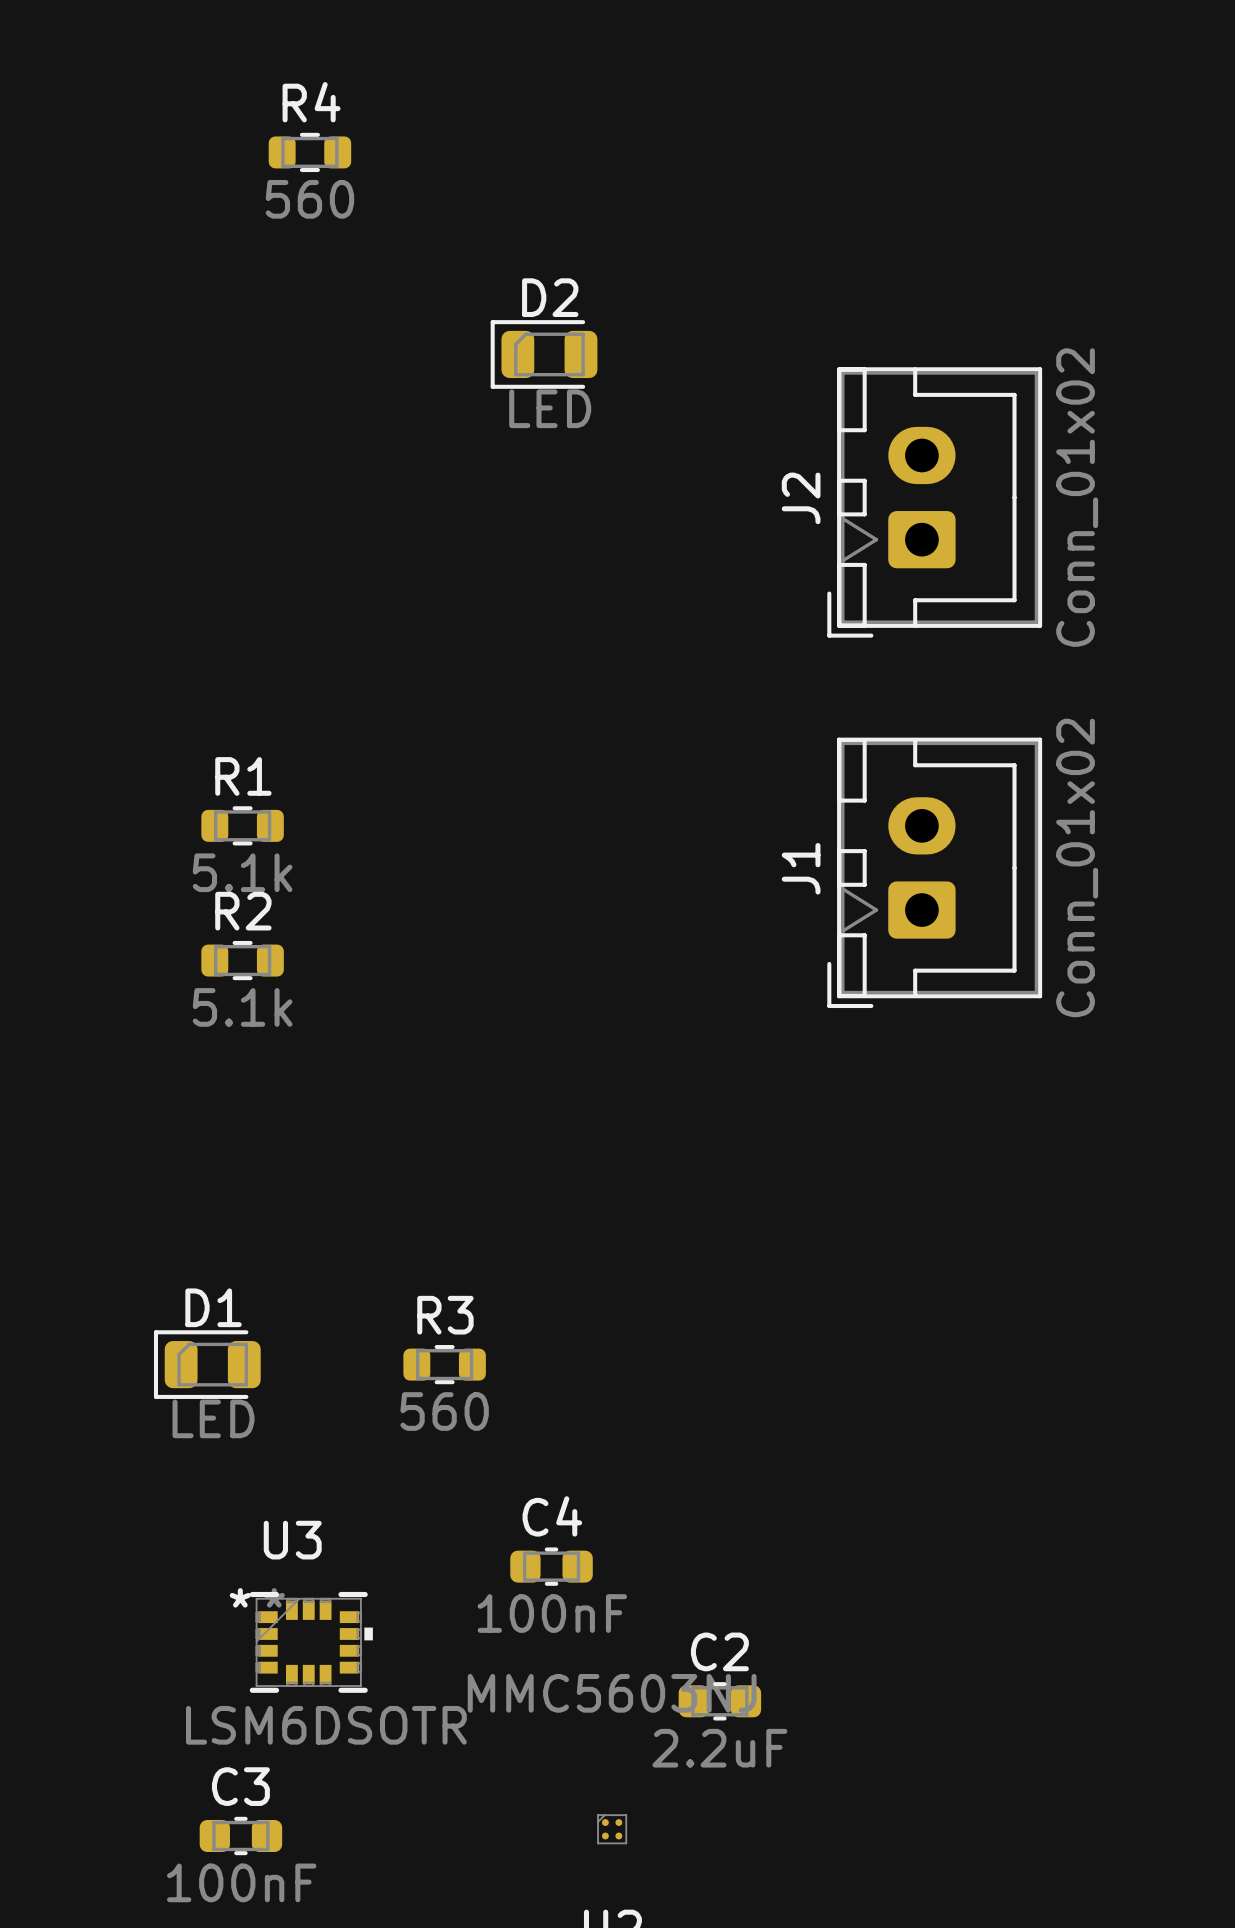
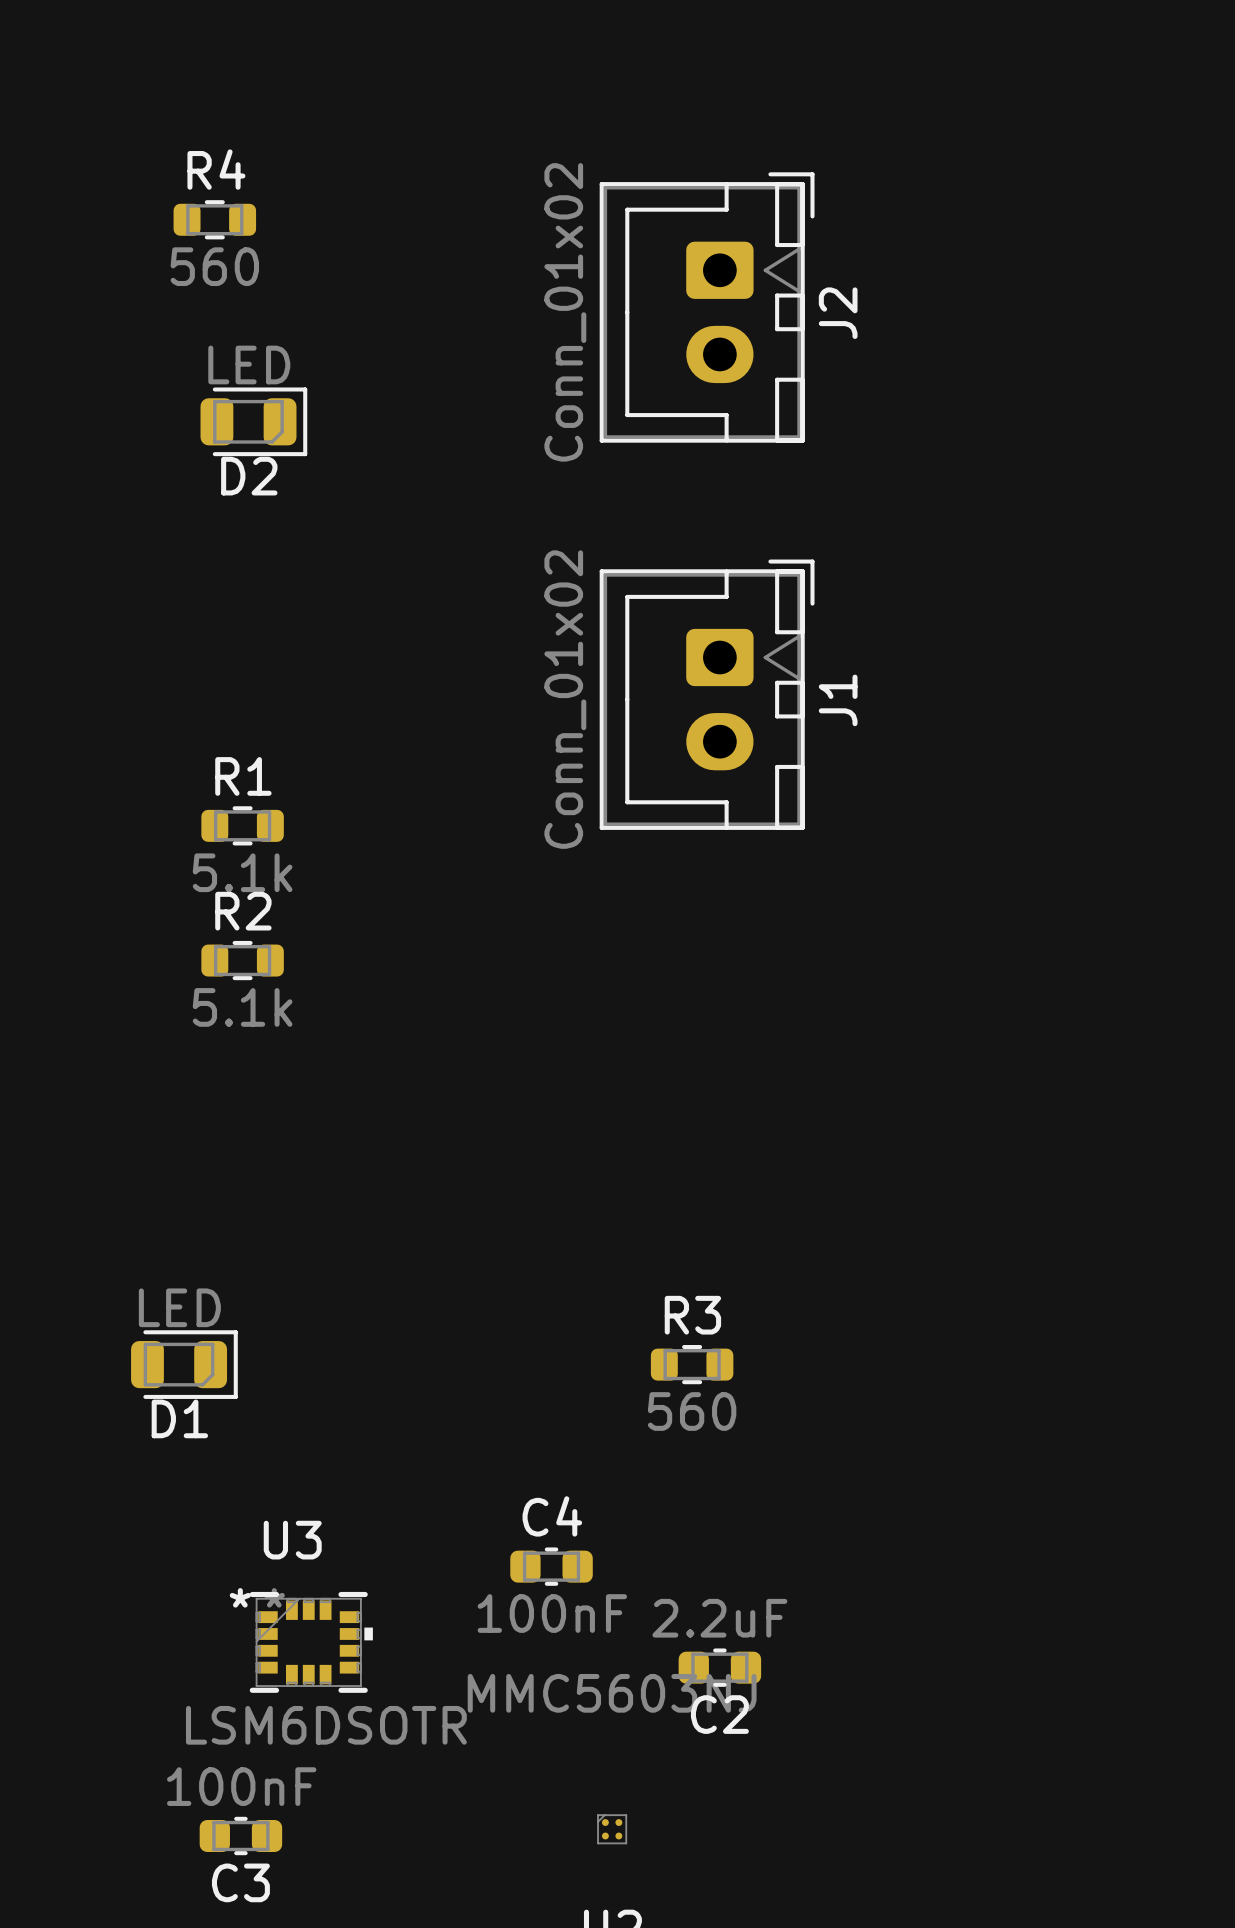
R4 position: (309, 152) -> (214, 219)
D2 rotation: 0° (544, 354) -> 180° (253, 421)
D2 position: (544, 354) -> (253, 421)
J2 rotation: 0° (934, 502) -> 180° (707, 307)
J2 position: (934, 502) -> (707, 307)
J1 rotation: 0° (934, 872) -> 180° (707, 694)
J1 position: (934, 872) -> (707, 694)
D1 rotation: 0° (207, 1364) -> 180° (184, 1364)
R3 position: (444, 1364) -> (692, 1364)
C2 name position: C2 (719, 1651) -> C2 (719, 1714)
C2 position: (719, 1701) -> (719, 1667)
C2 value position: 2.2uF (719, 1748) -> 2.2uF (719, 1618)
C3 name position: C3 (240, 1786) -> C3 (240, 1882)
C3 value position: 100nF (241, 1882) -> 100nF (241, 1786)

